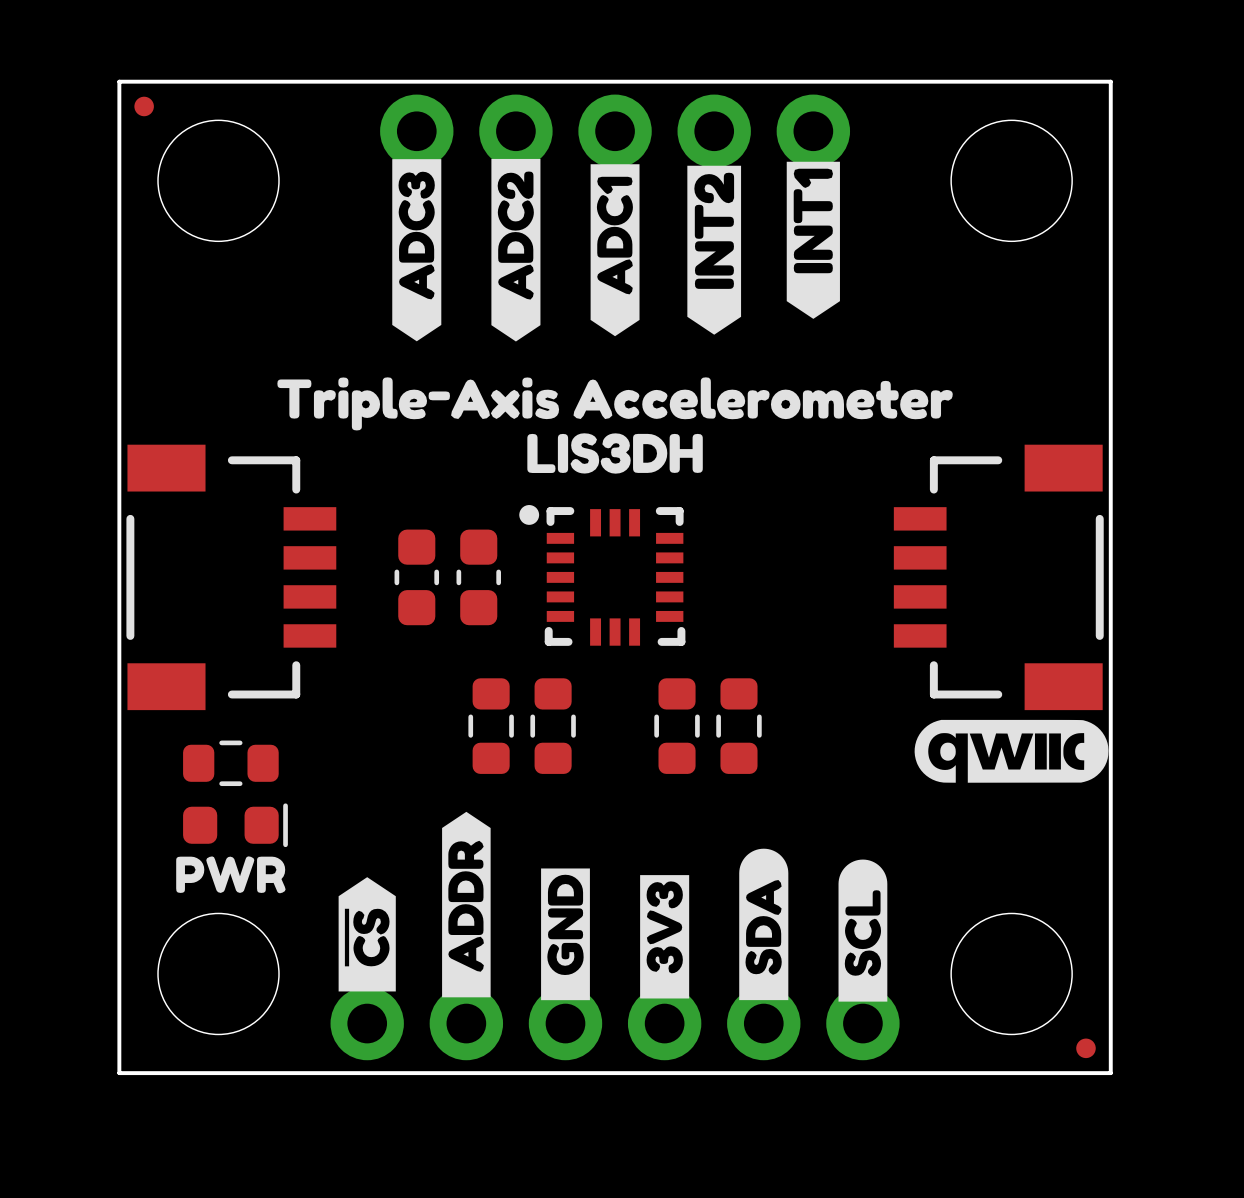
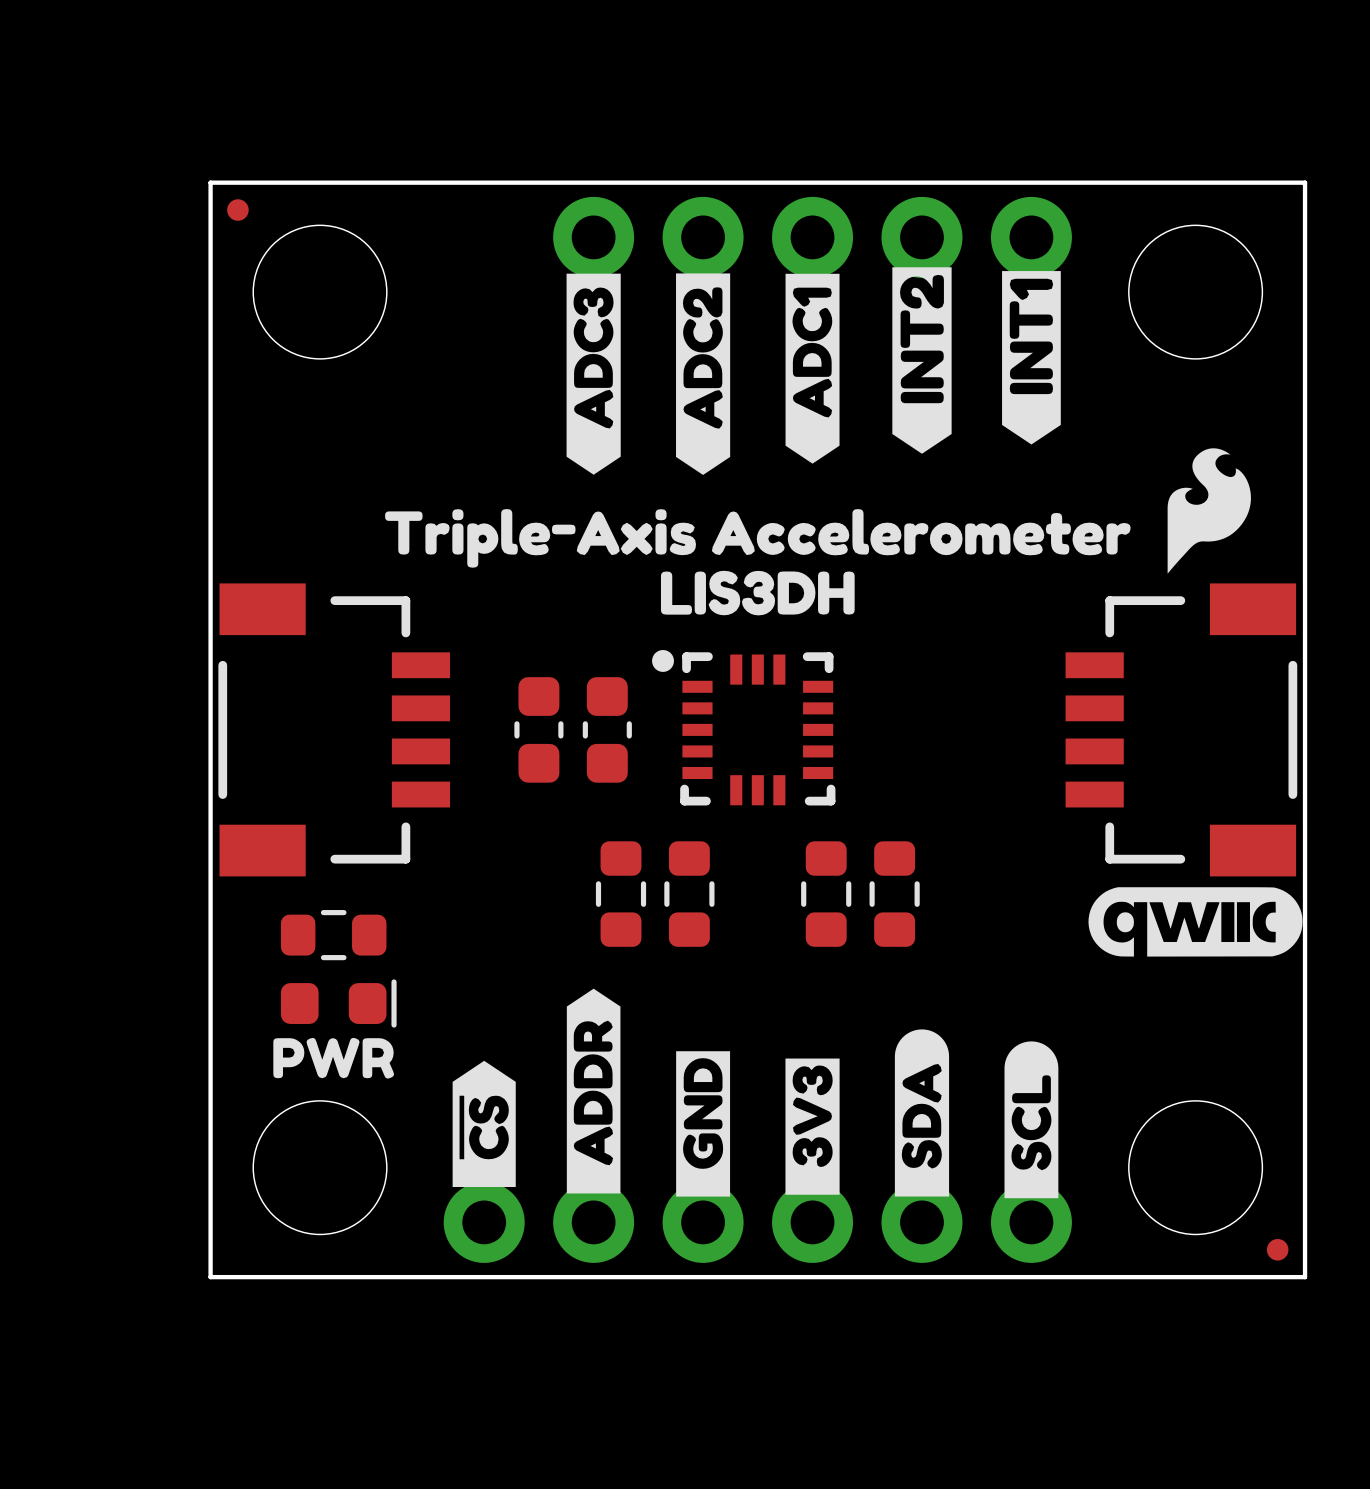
part position: (615, 131) -> (812, 237)
drawing position: (813, 240) -> (1031, 357)
drawing position: (416, 250) -> (593, 374)
drawing position: (515, 250) -> (703, 374)
drawing position: (615, 250) -> (812, 368)
drawing position: (714, 250) -> (921, 360)
drawing: none -> [1167, 448, 1251, 574]

